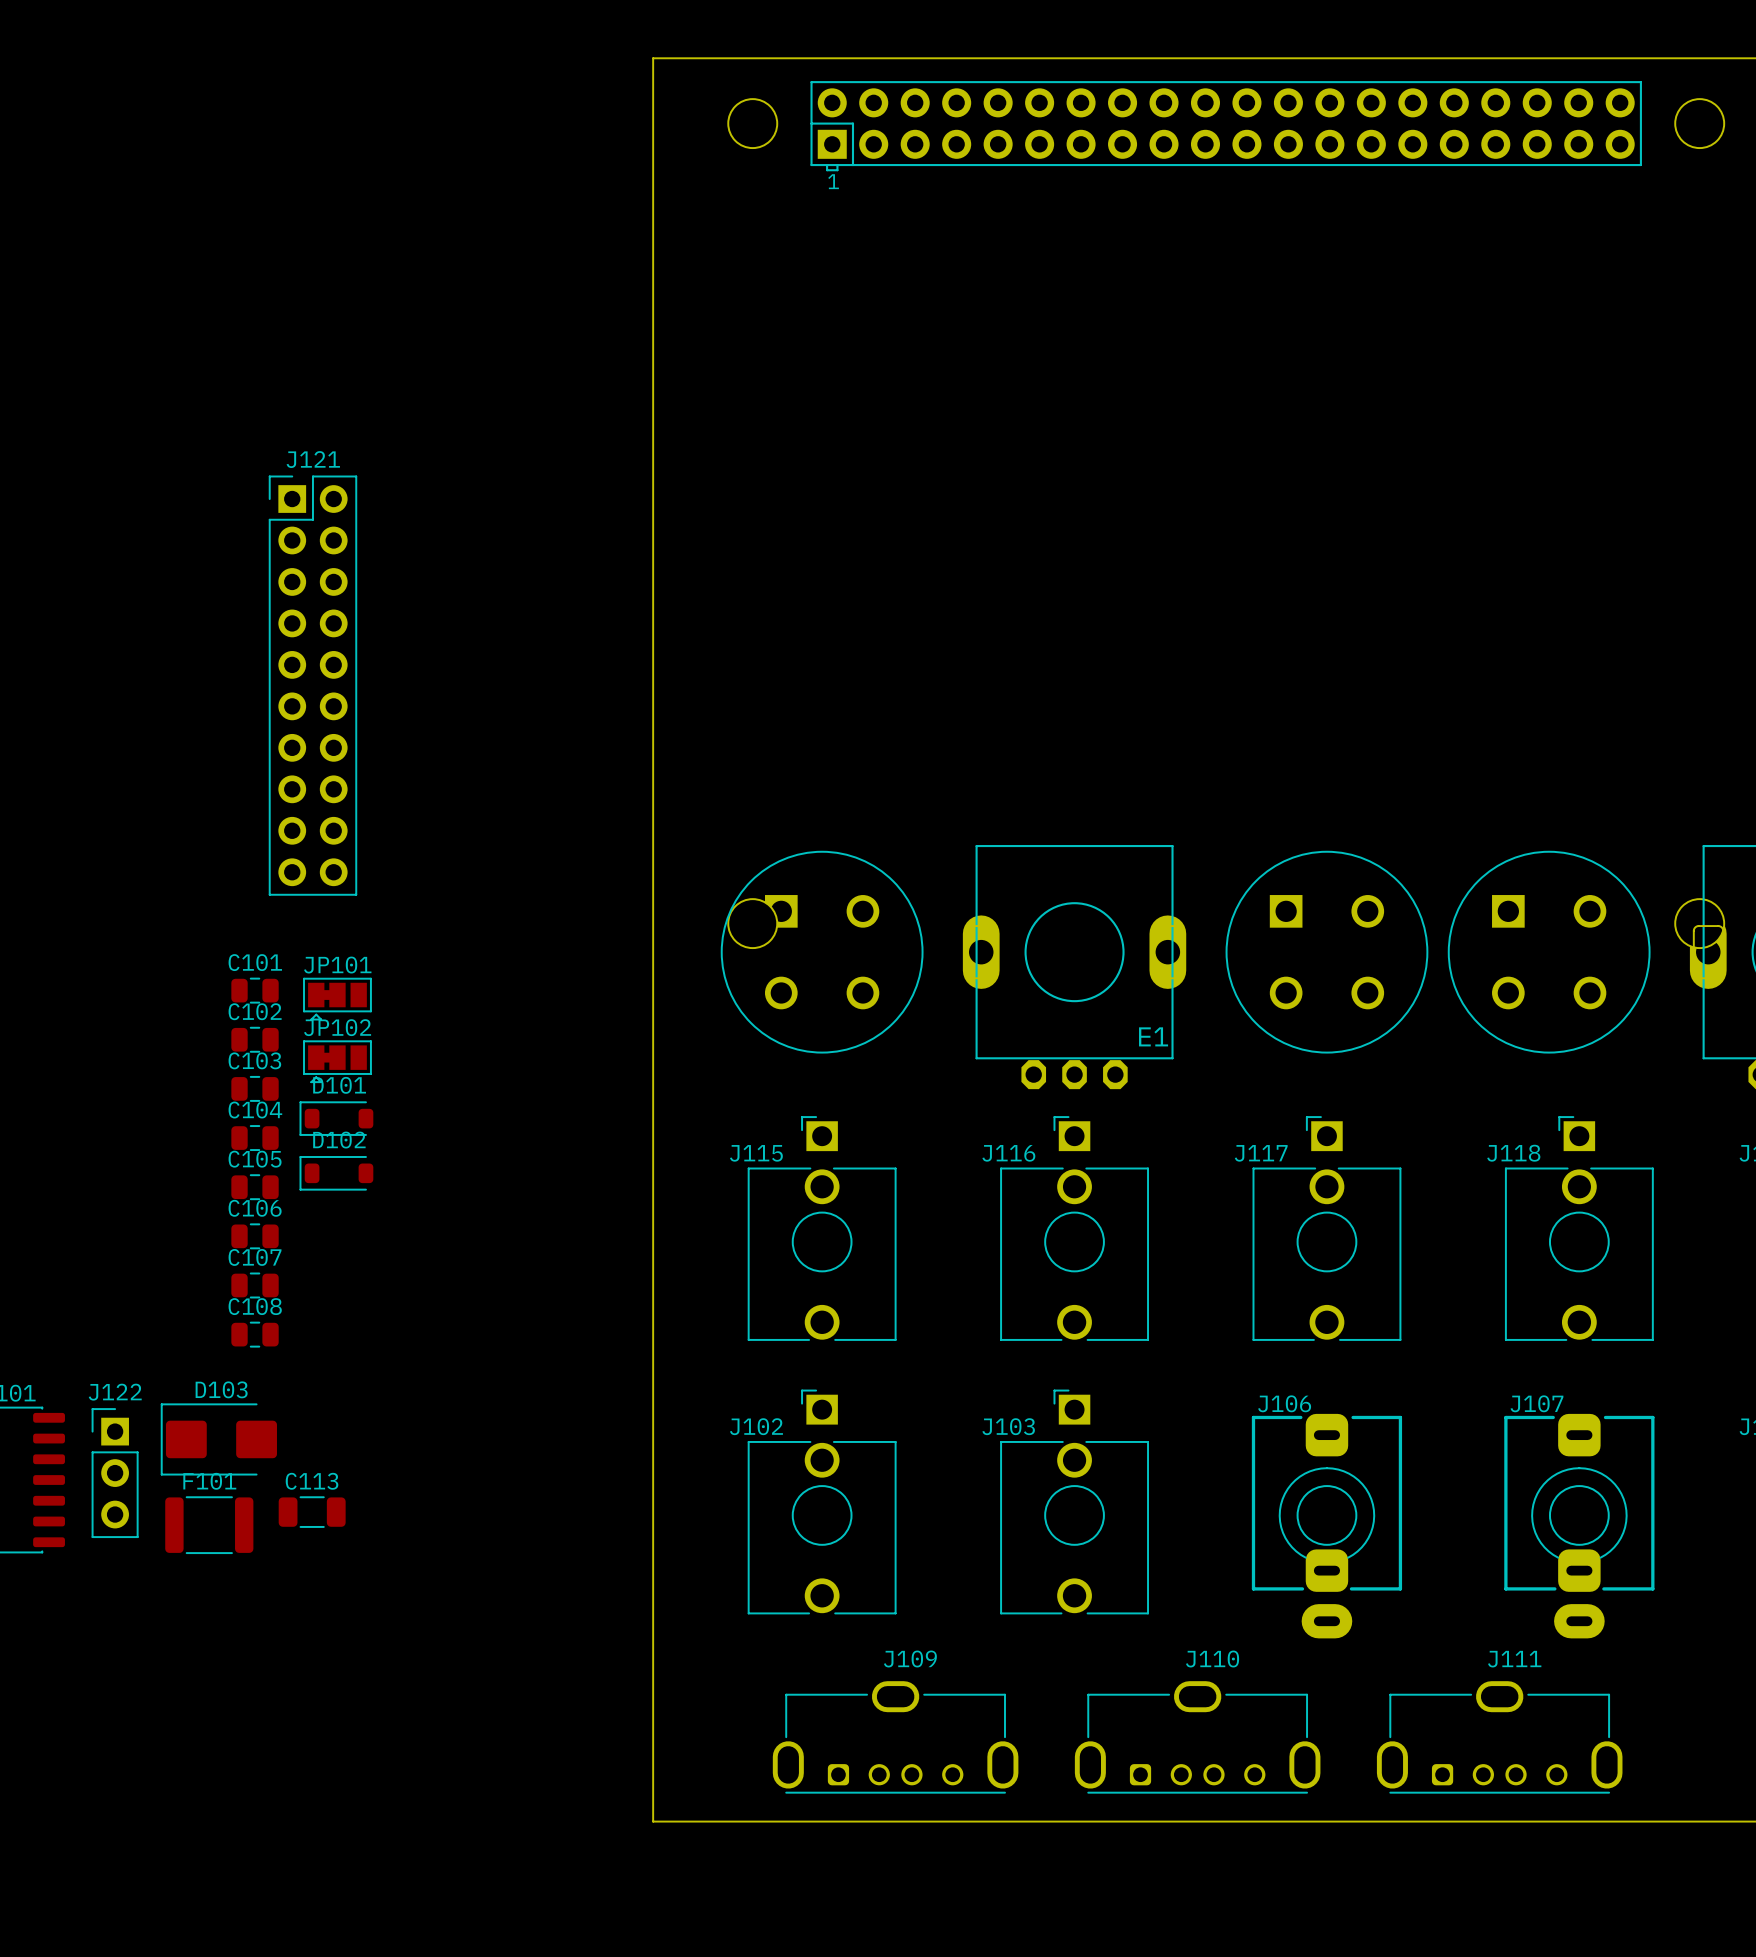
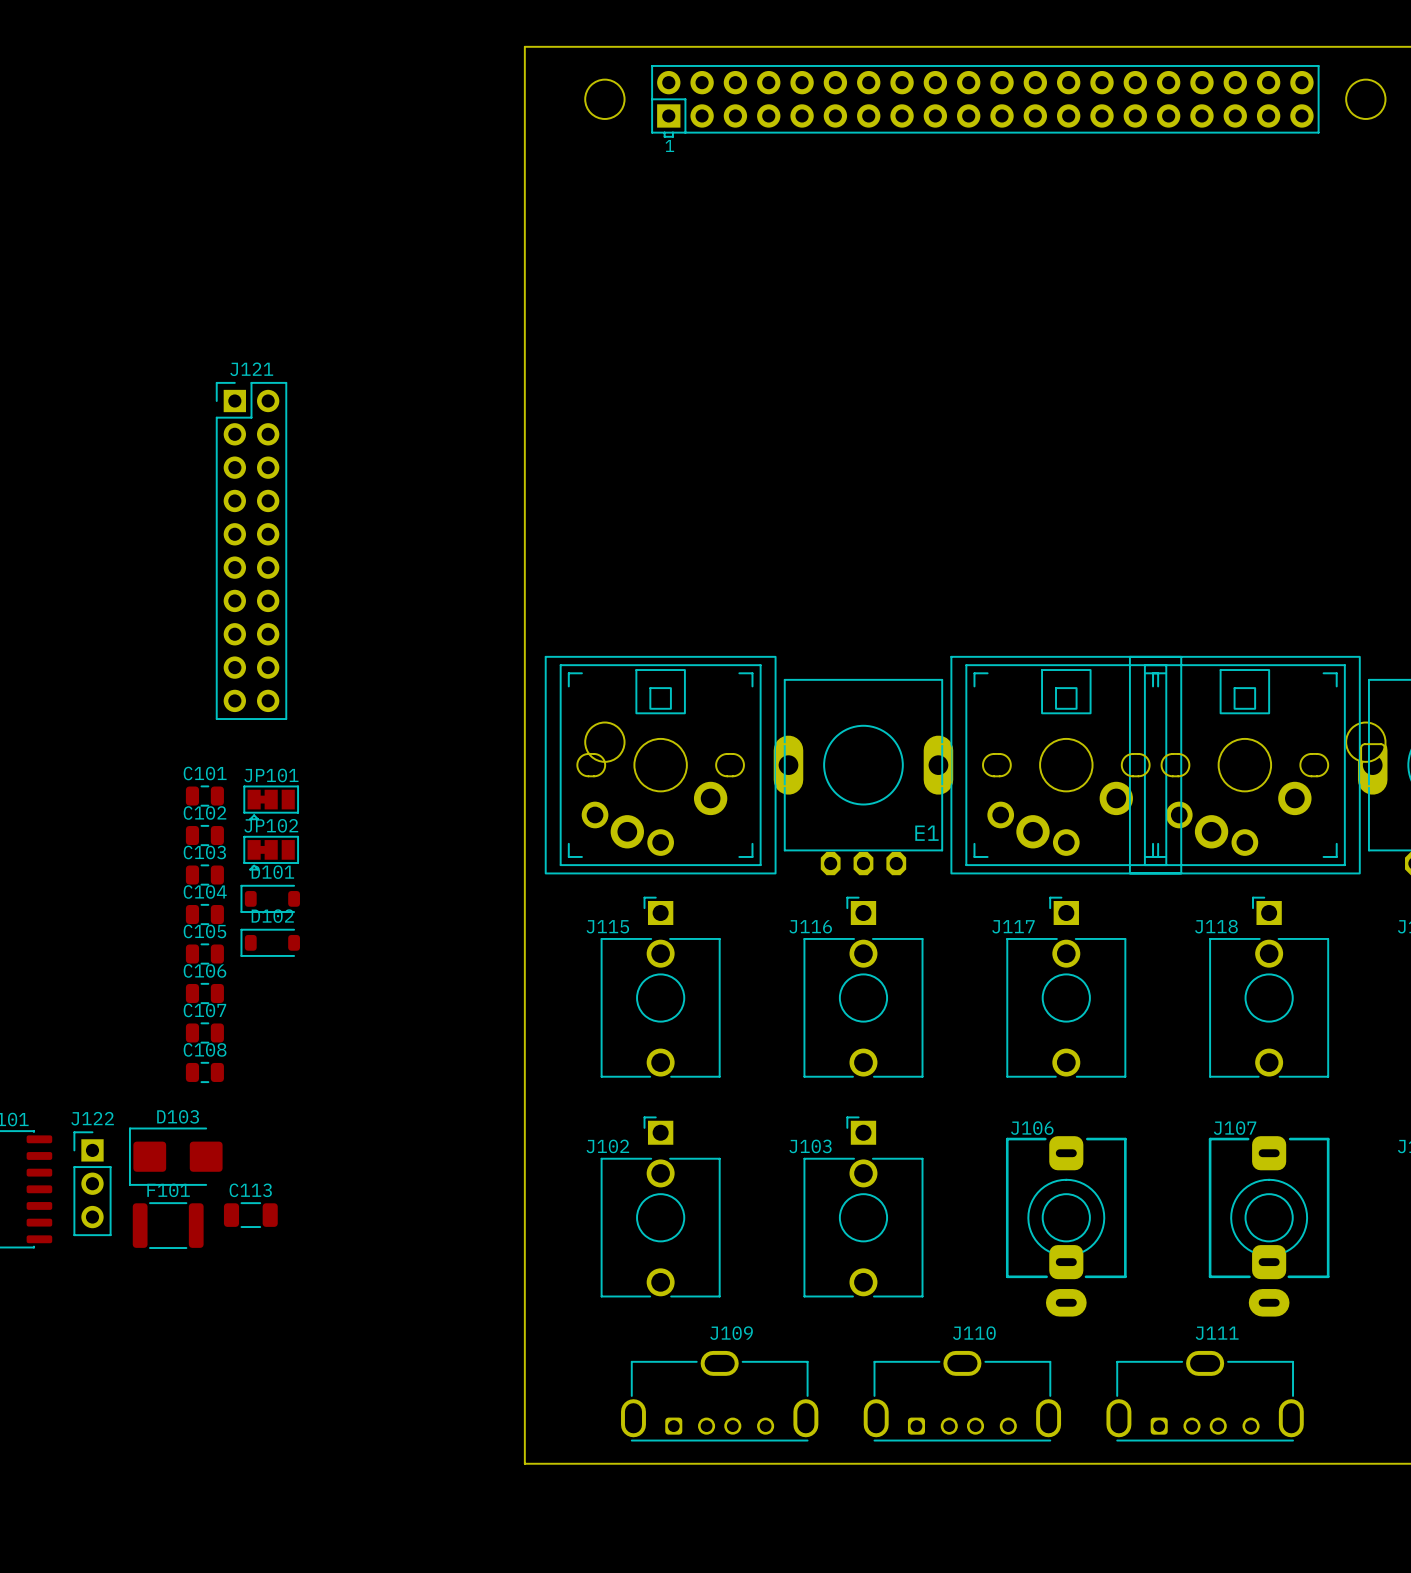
part footprint: [720, 850, 924, 1054] -> [545, 656, 777, 875]
part footprint: [1225, 850, 1429, 1054] -> [950, 656, 1182, 875]
part footprint: [1447, 850, 1651, 1054] -> [1129, 656, 1361, 875]

